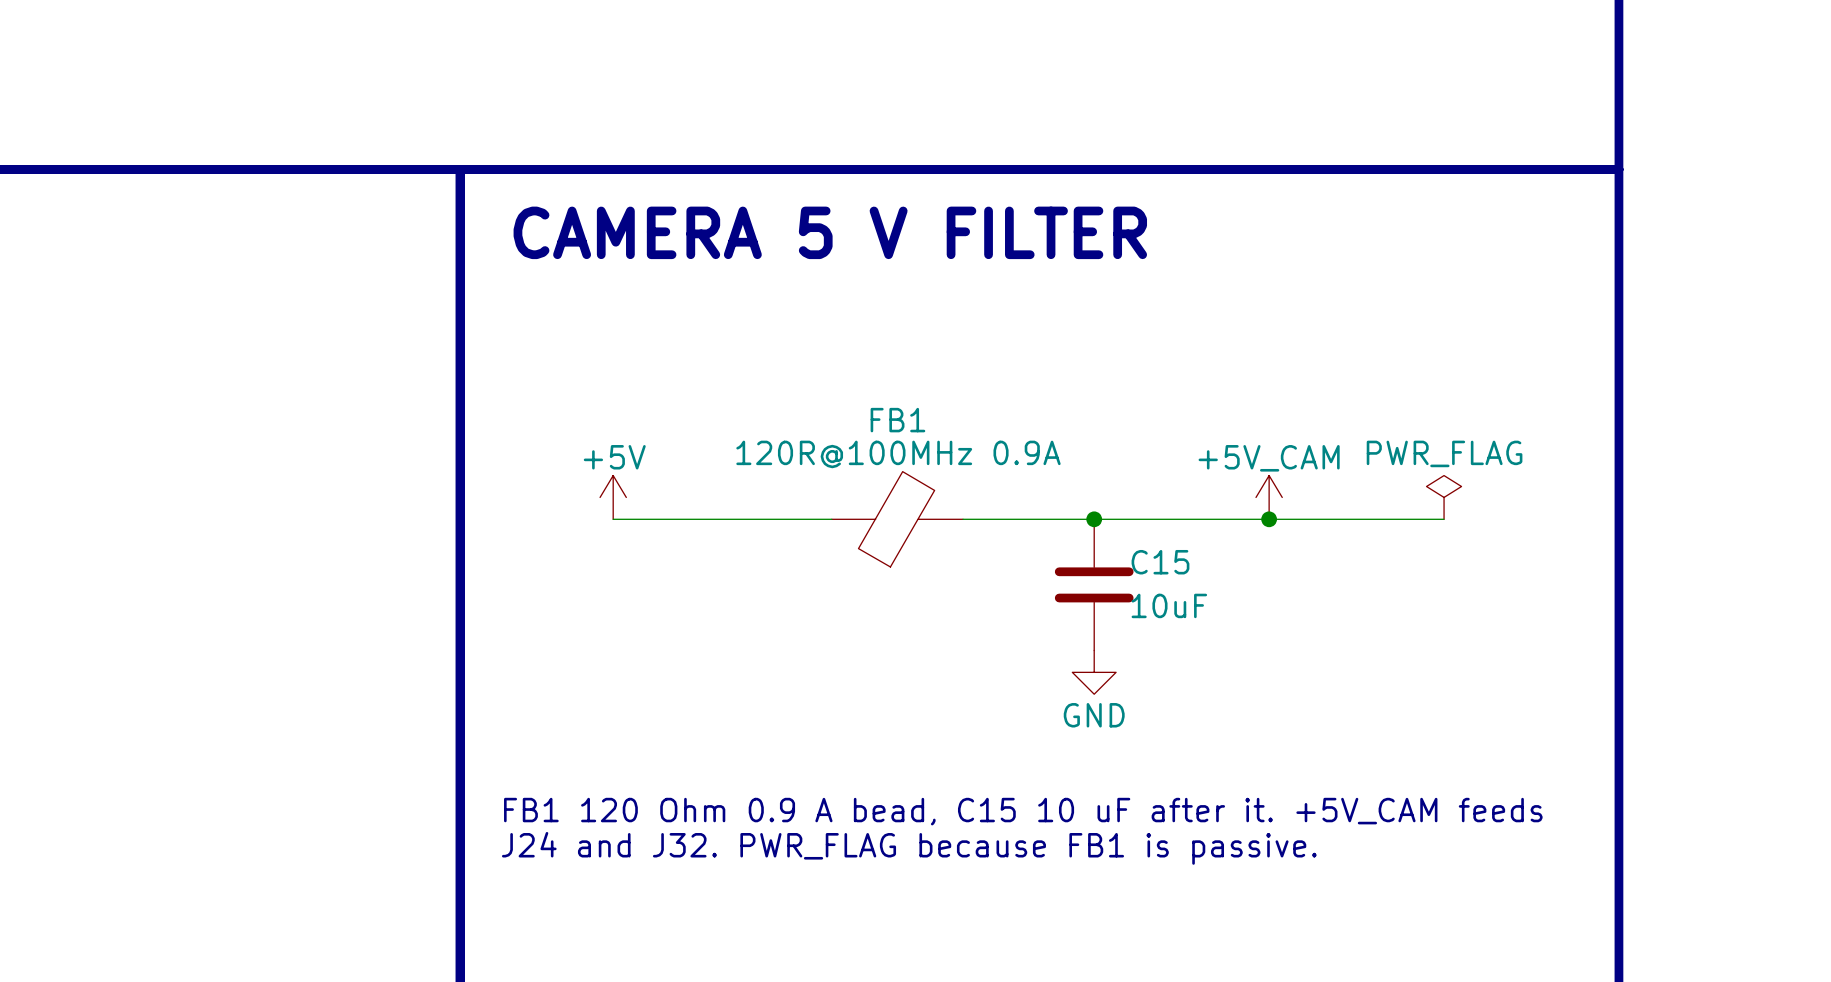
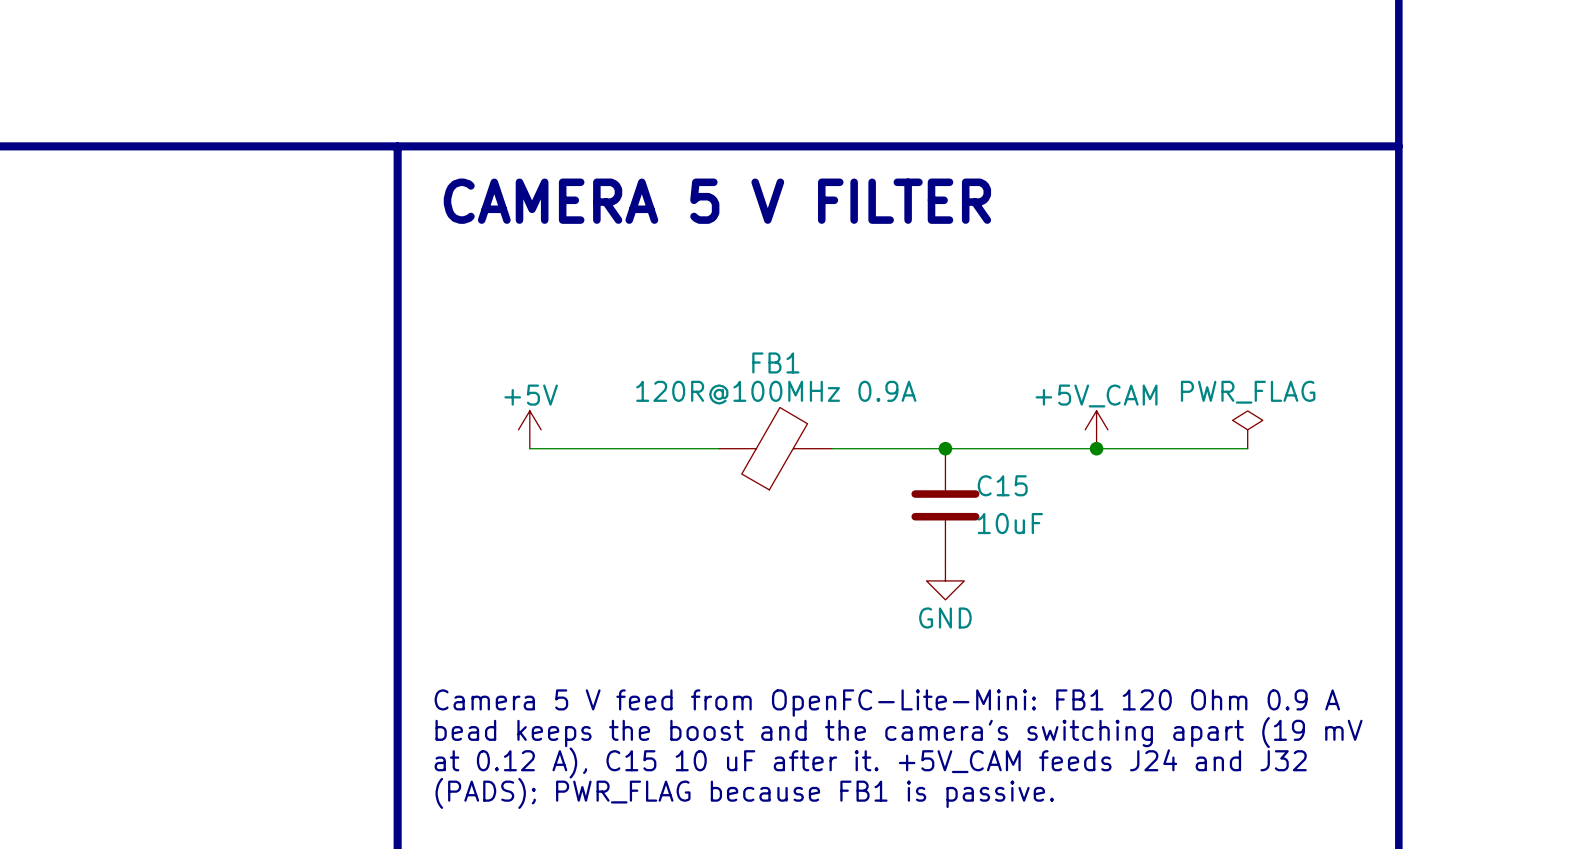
text: FB1 120 Ohm 0.9 A bead, C15 10 uF after it. +5V_CAM feeds (1023, 811) -> Camera 5 V feed from OpenFC-Lite-Mini: FB1 120 Ohm 0.9 A (887, 703)
text: J24 and J32. PWR_FLAG because FB1 is passive. (909, 848) -> bead keeps the boost and the camera's switching apart (19 mV (899, 732)
text: none -> at 0.12 A), C15 10 uF after it. +5V_CAM feeds J24 and J32 (870, 762)
text: none -> (PADS); PWR_FLAG because FB1 is passive. (744, 793)

